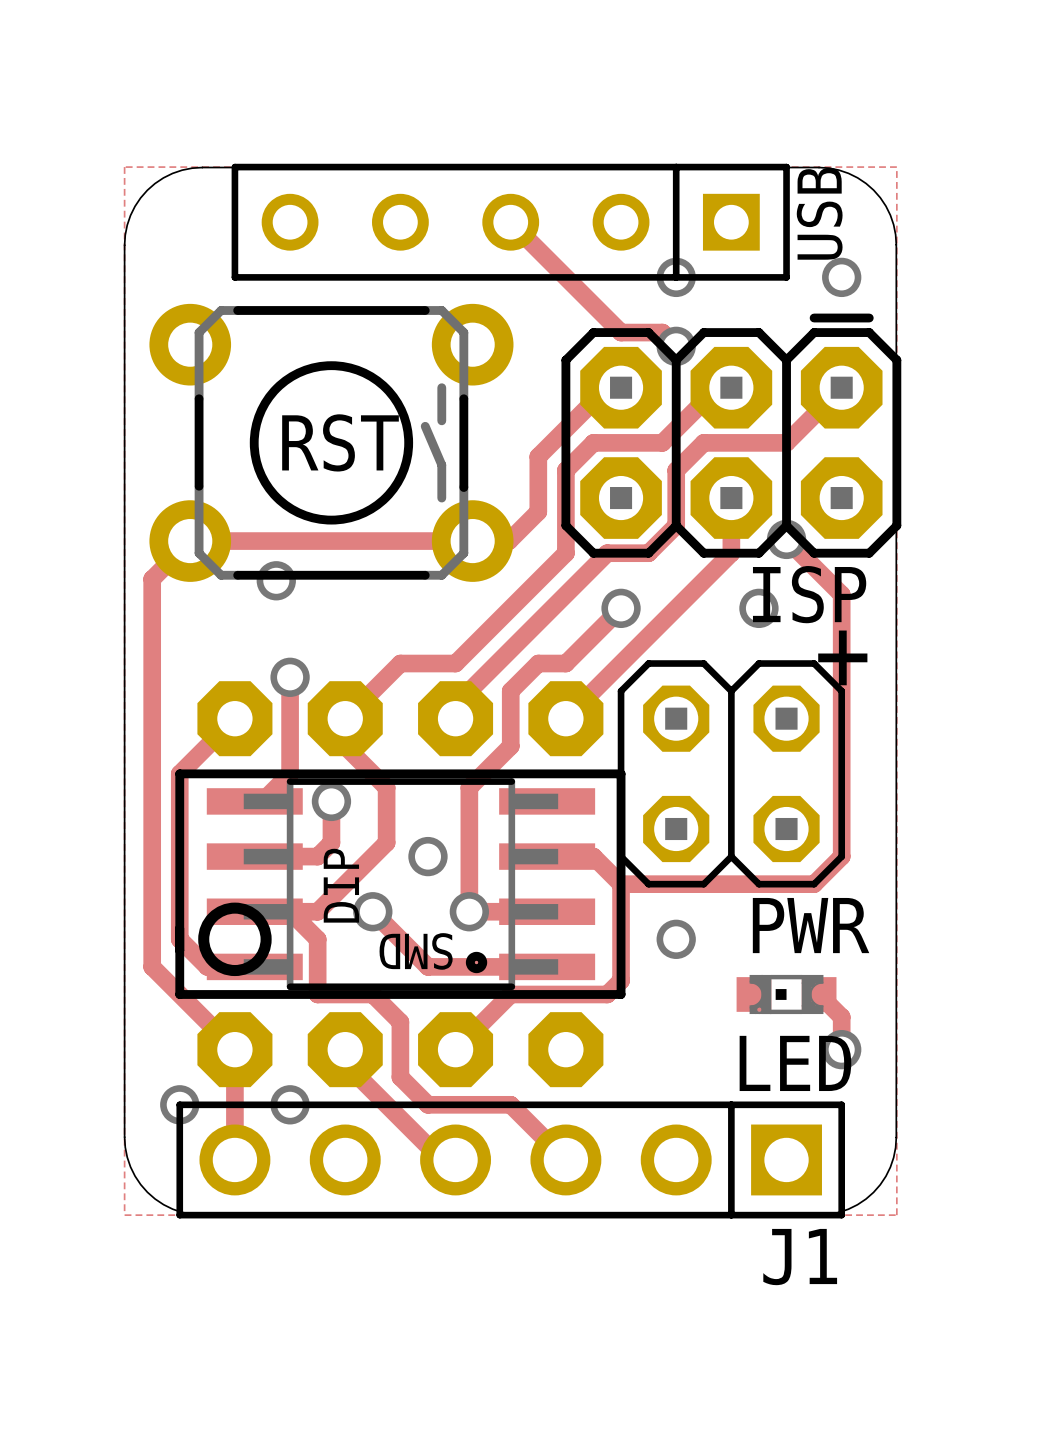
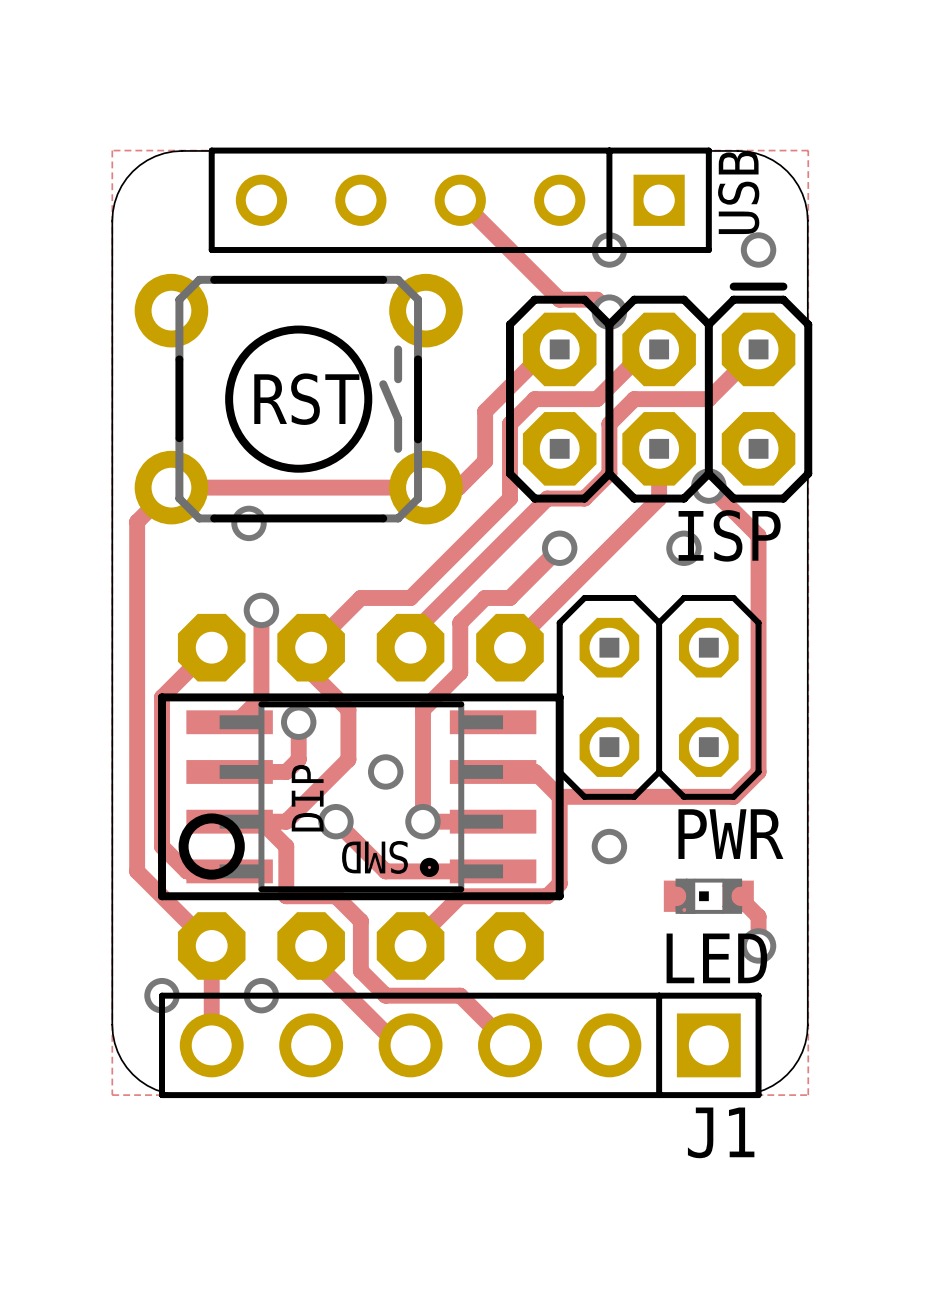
text: + (842, 657) -> none

